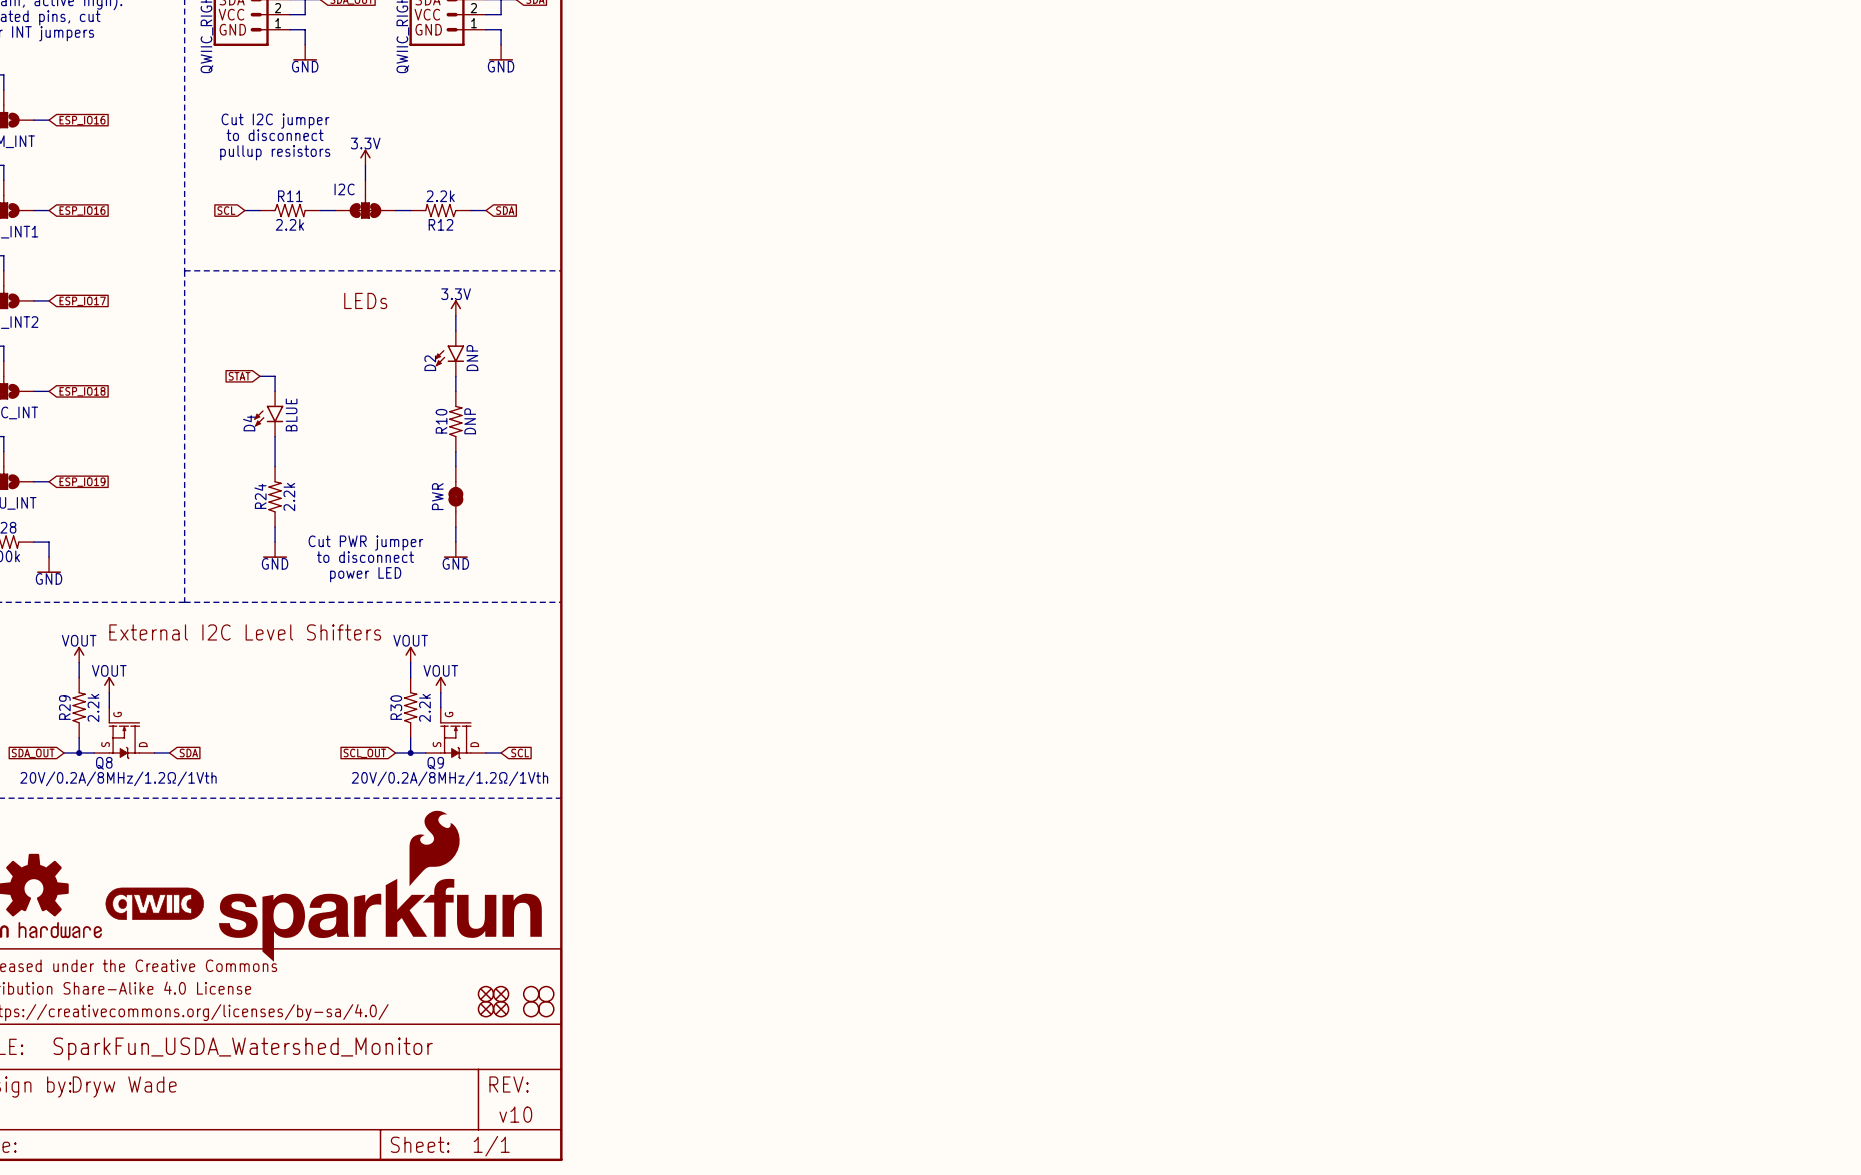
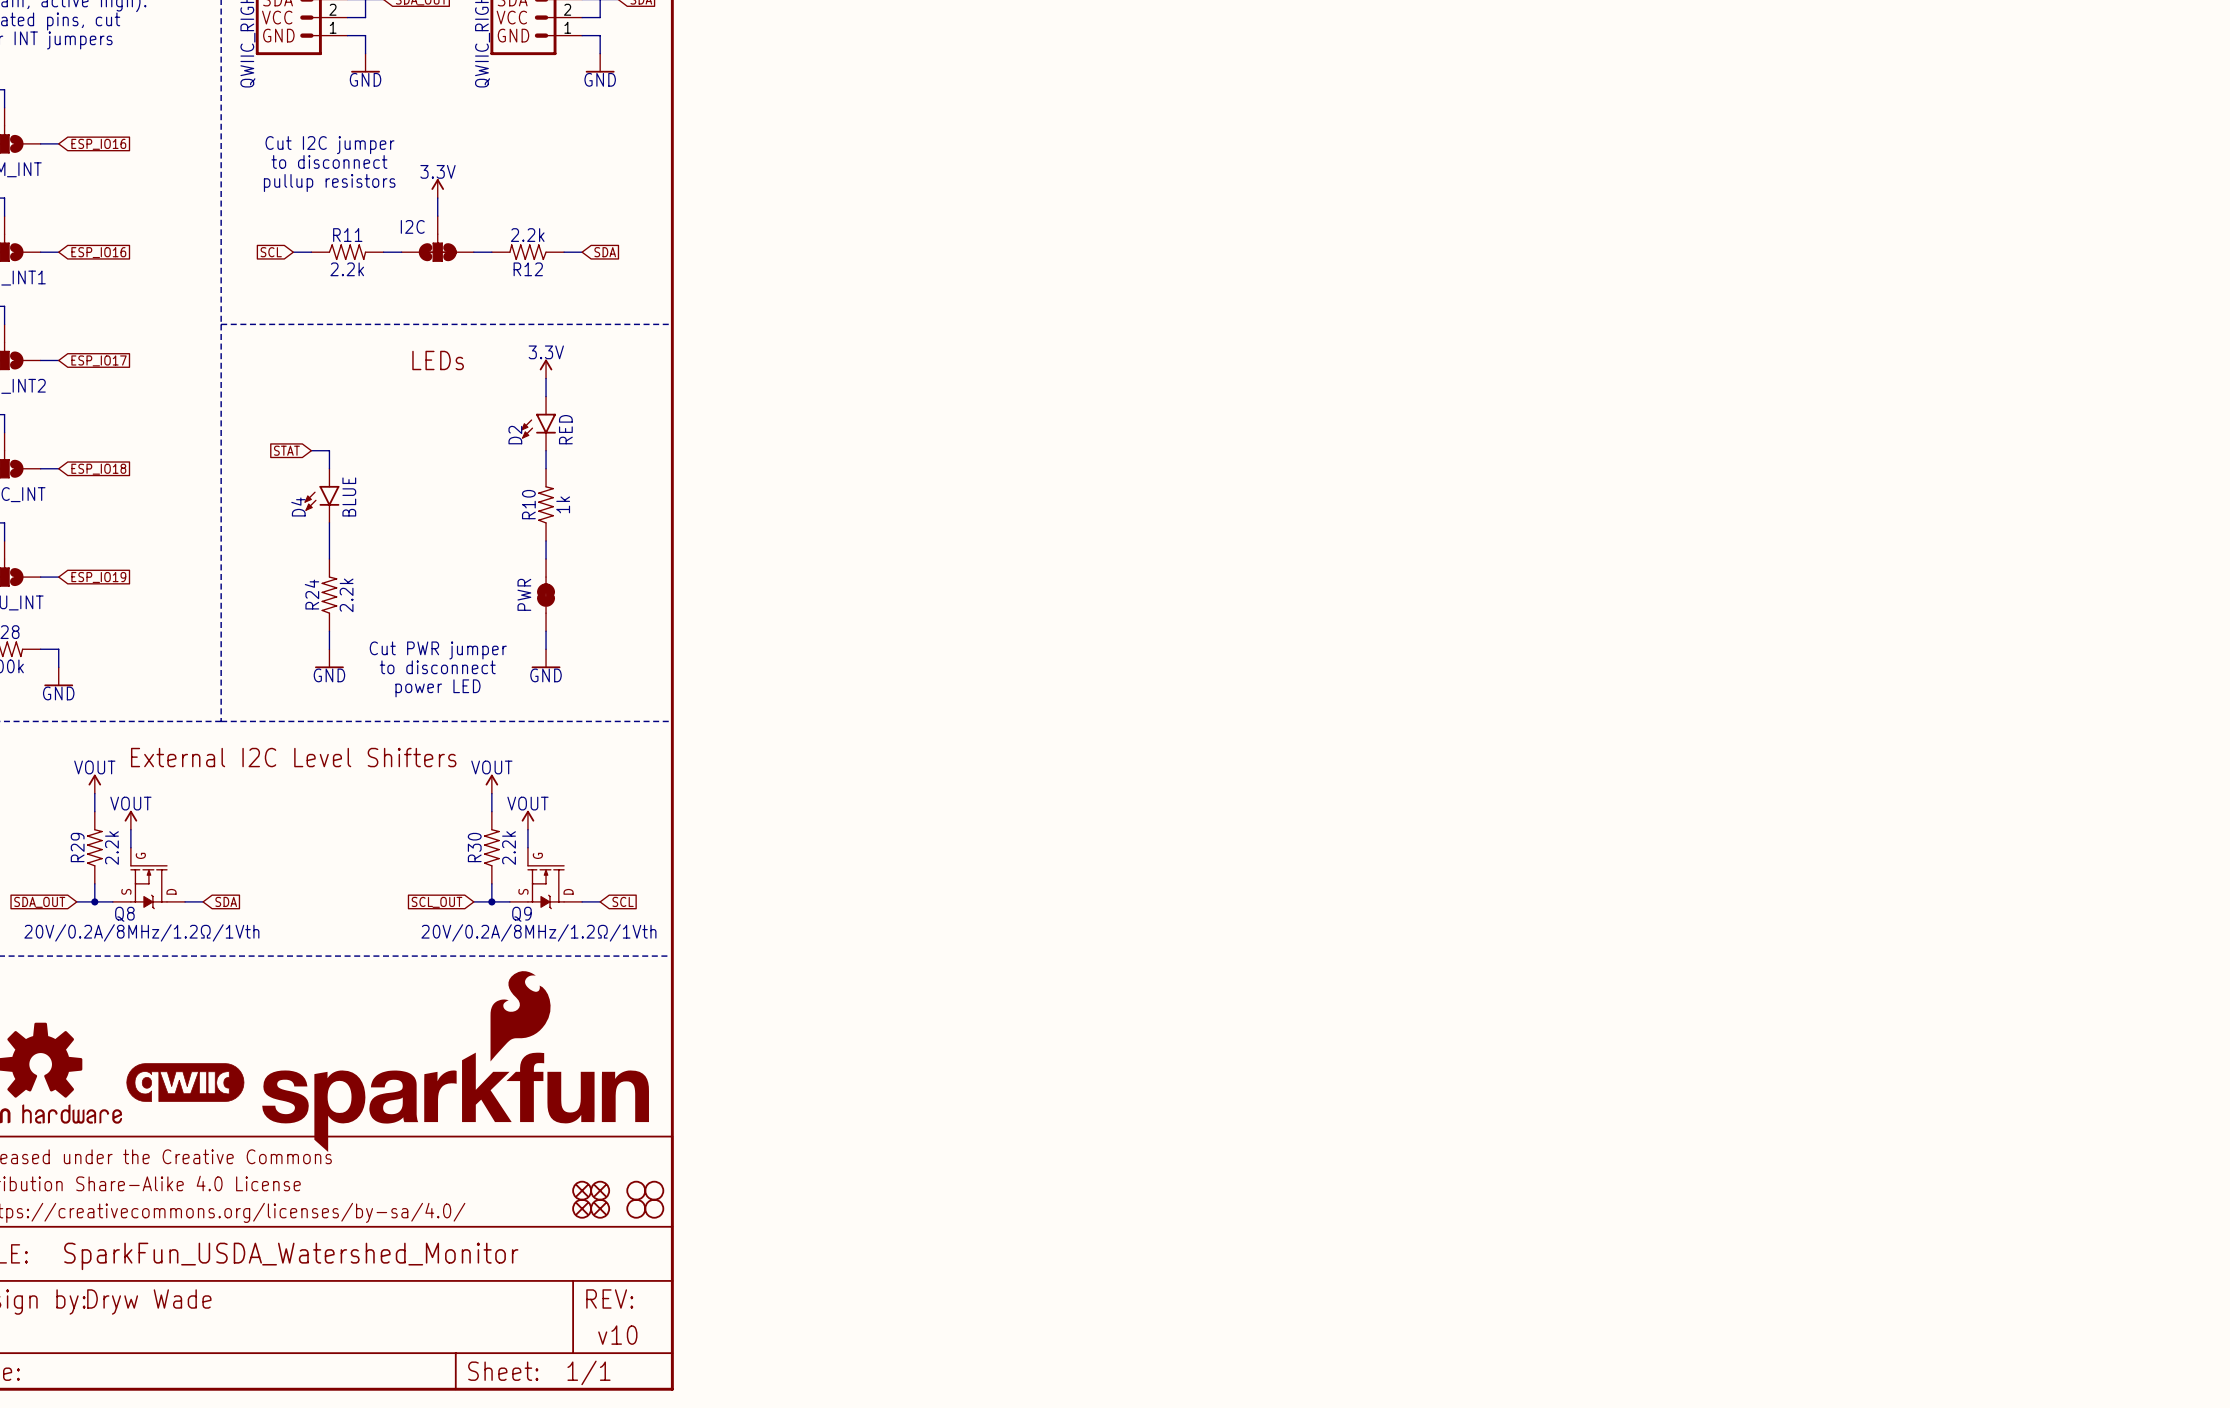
D2 value: DNP (472, 358) -> RED (565, 429)
R10 value: DNP (470, 421) -> 1k (563, 504)

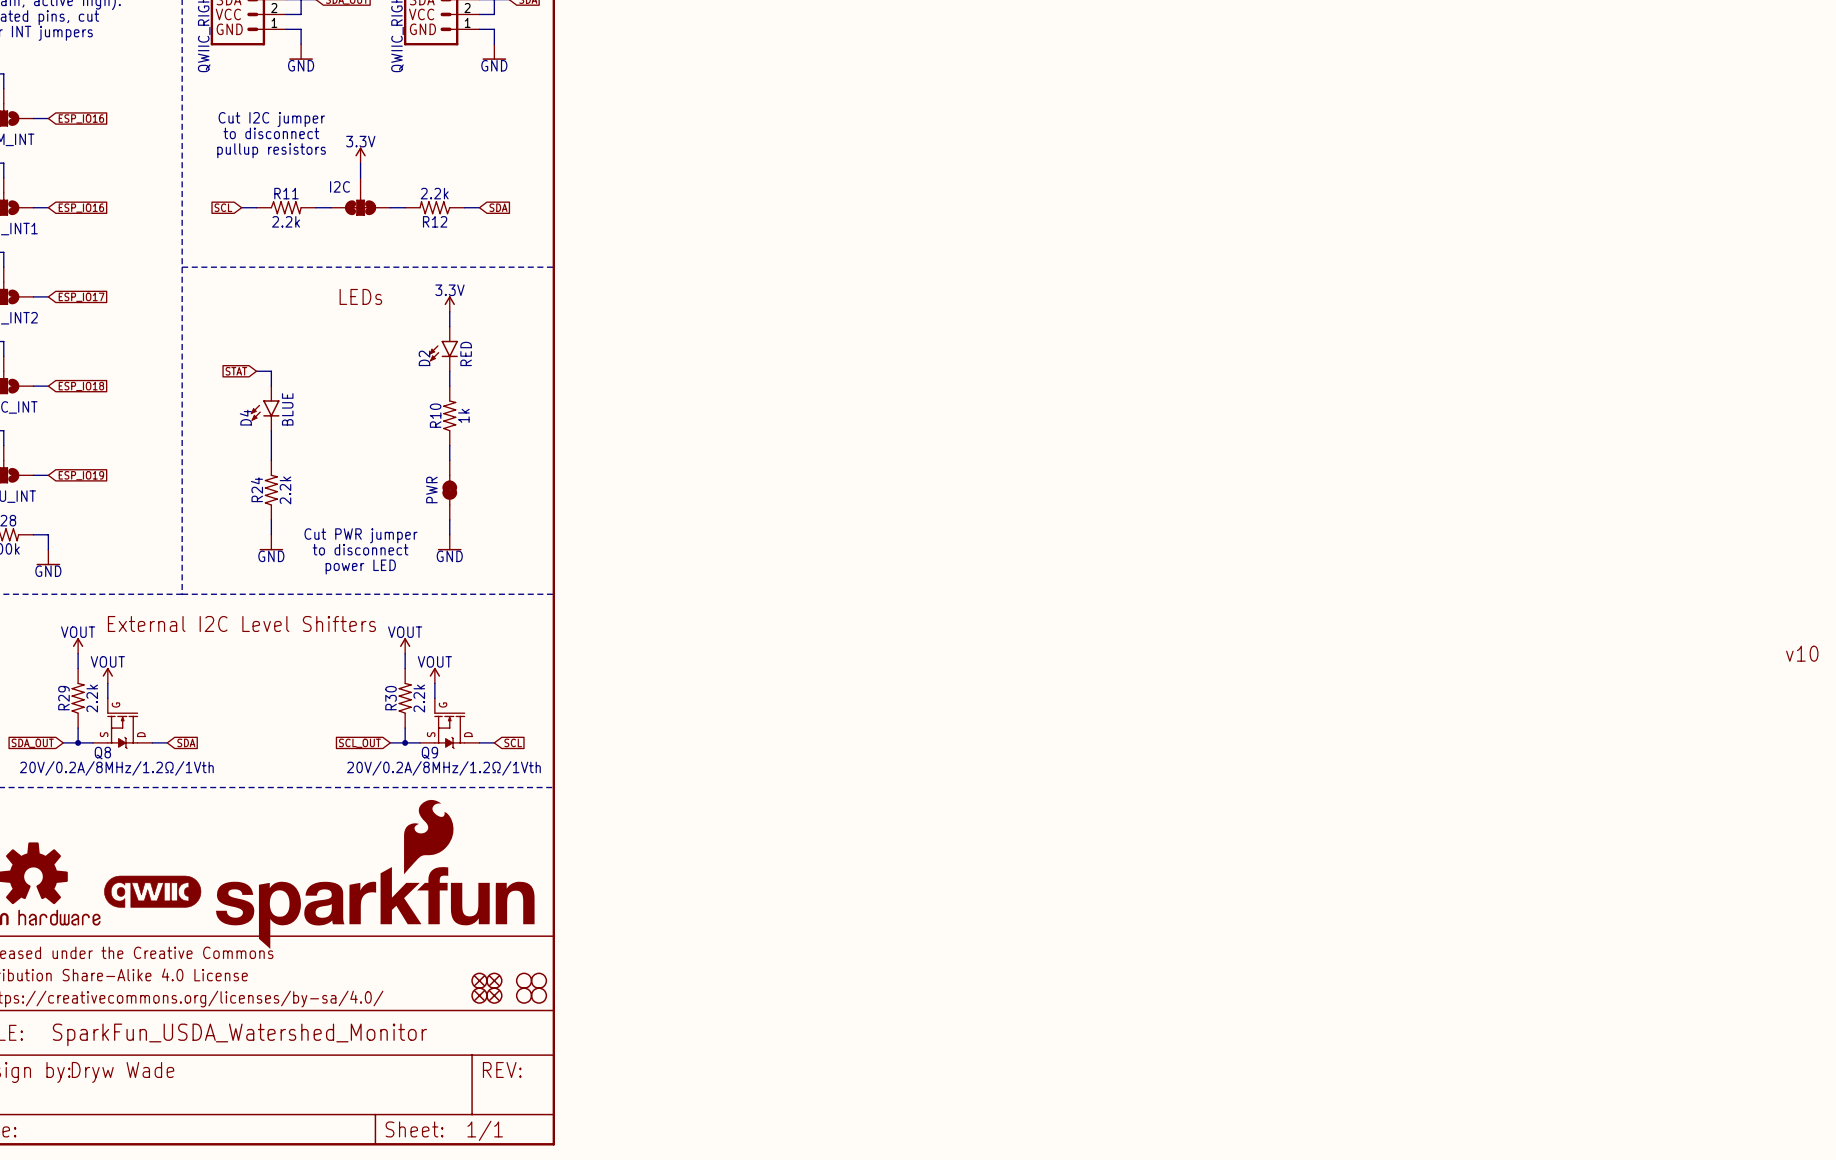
text: none -> v10 (1802, 653)
text: v10 (617, 1335) -> none

